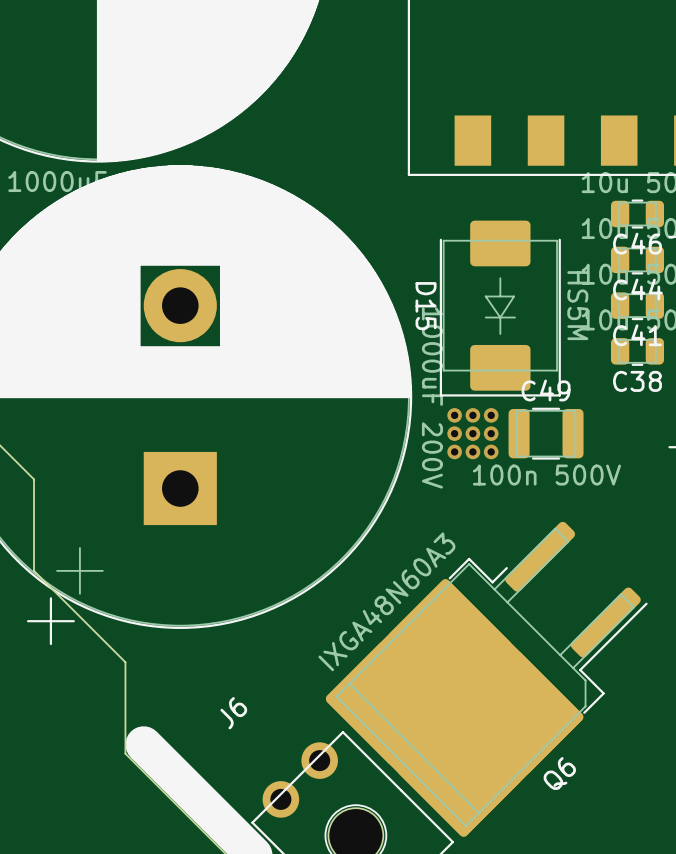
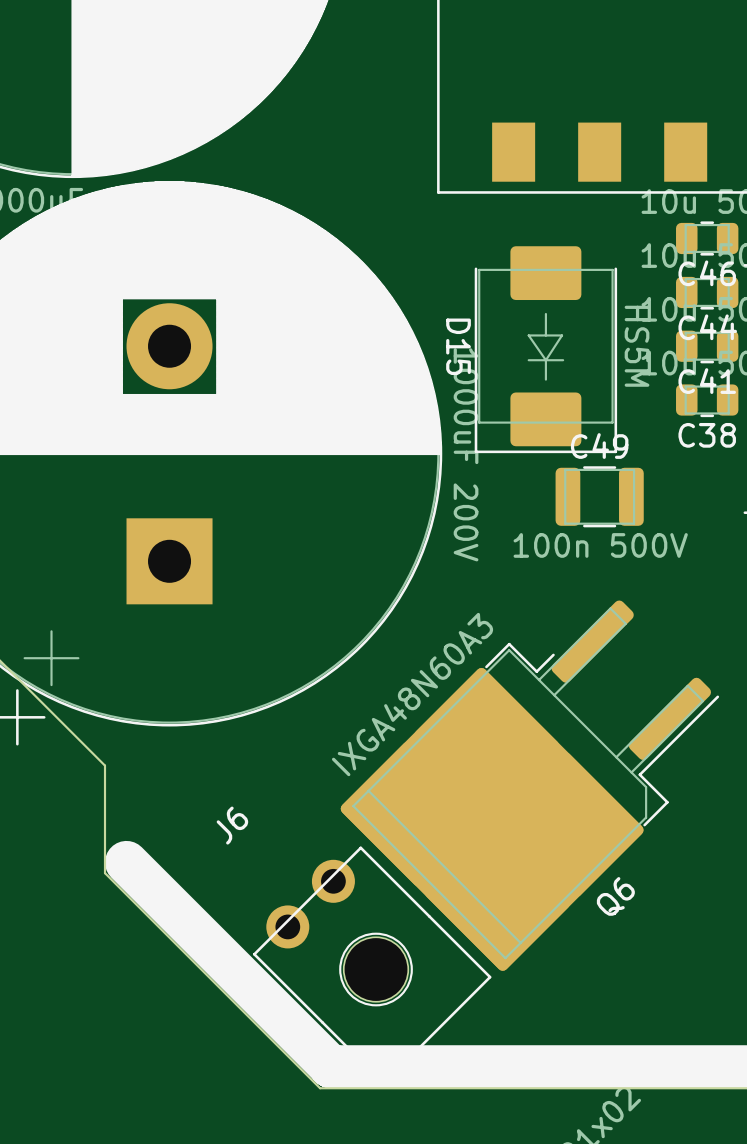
via: (454, 415) -> none
via: (472, 415) -> none
via: (491, 415) -> none
via: (454, 433) -> none
via: (472, 433) -> none
via: (491, 433) -> none
via: (454, 451) -> none
via: (472, 451) -> none
via: (491, 451) -> none

